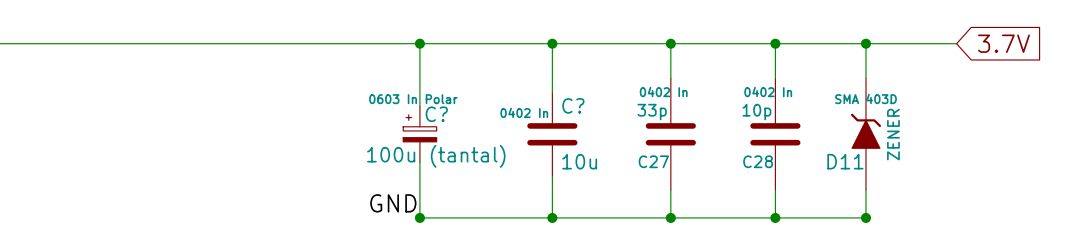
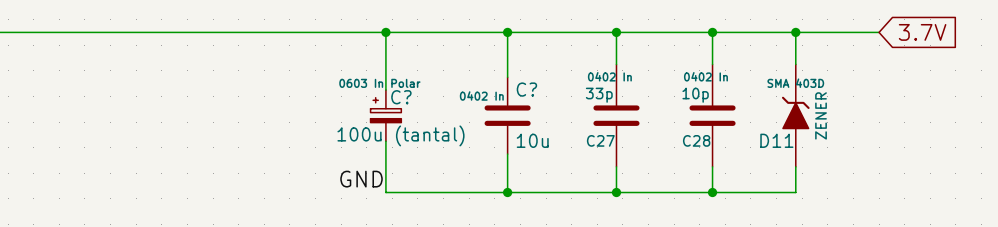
junction: (419, 217) -> none
junction: (865, 217) -> none

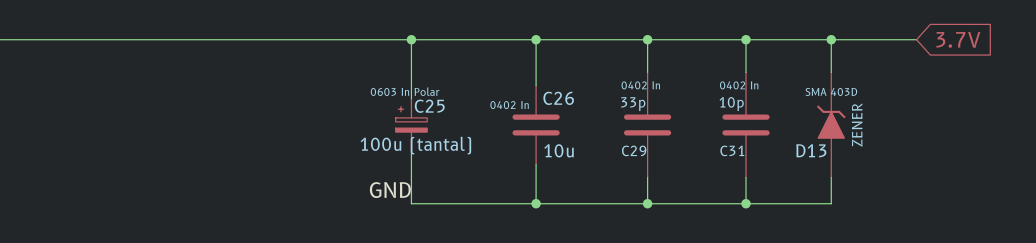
C? name: C? (526, 89) -> C26 (558, 98)
C? name: C? (401, 97) -> C25 (429, 106)
C27 name: C27 (600, 140) -> C29 (634, 150)
C28 name: C28 (696, 140) -> C31 (732, 150)
D11 name: D11 (776, 140) -> D13 (811, 150)

